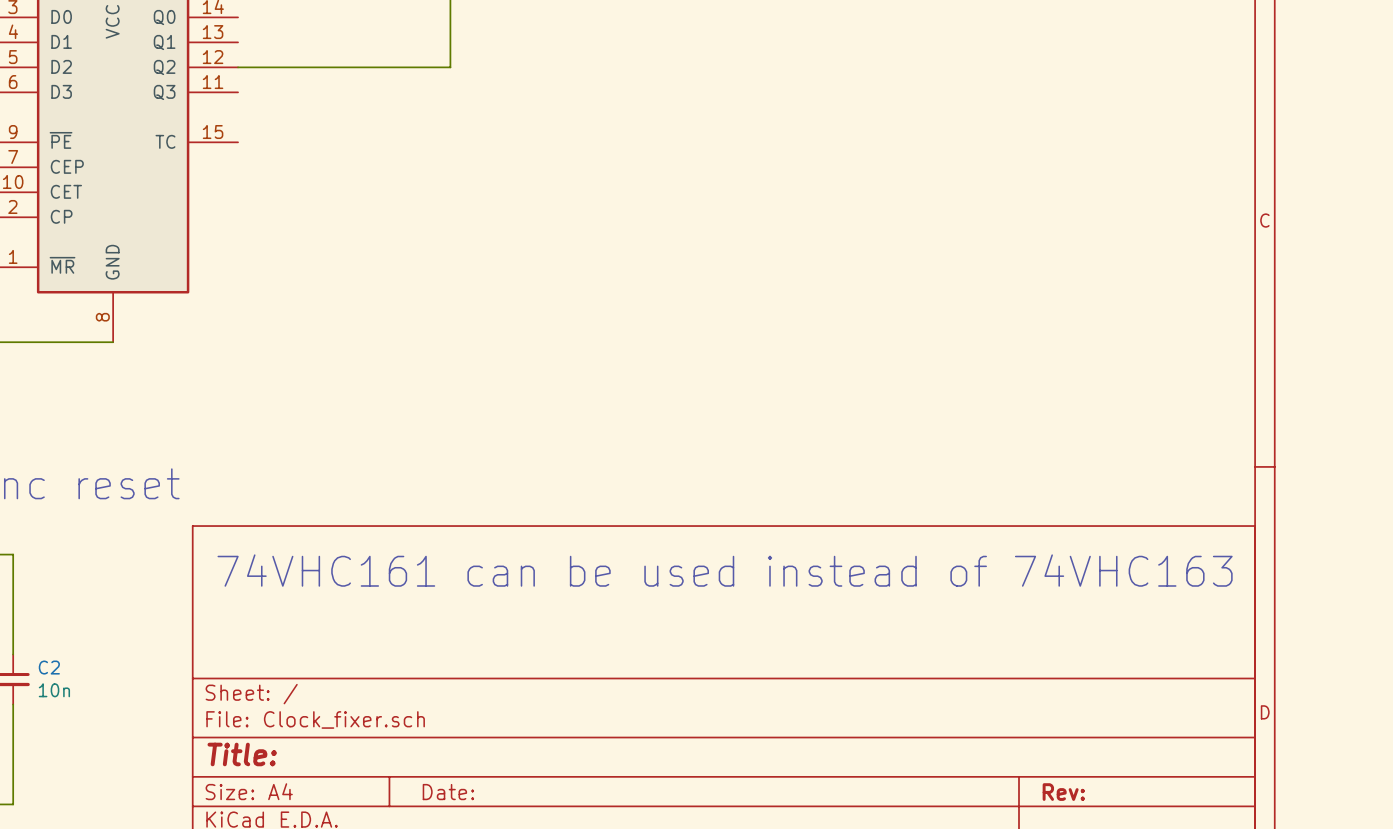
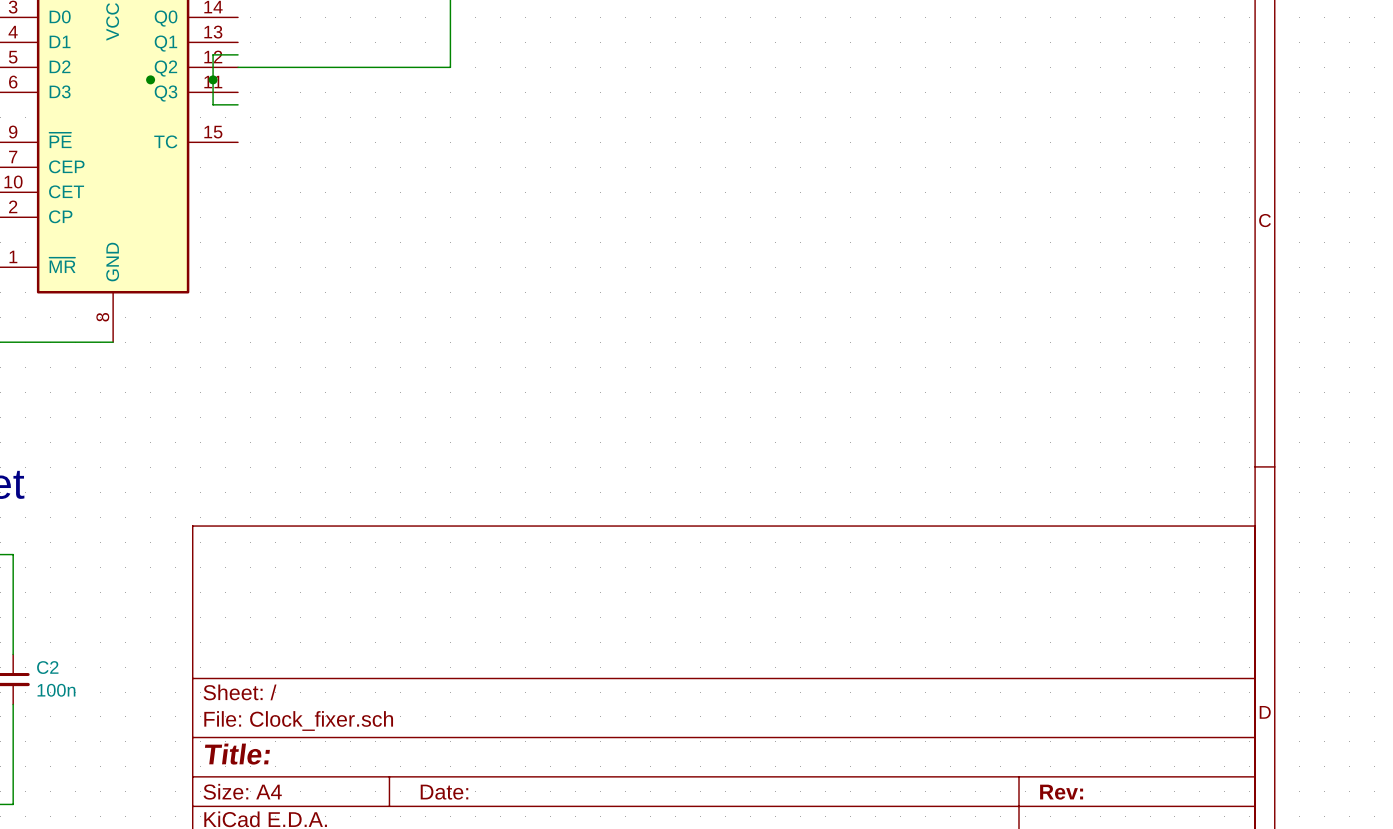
wire: none -> (238, 54) (213, 54) (213, 104) (238, 104)
junction: none -> (150, 79)
junction: none -> (213, 79)
text: 74VHC161 can be used instead of 74VHC163 (725, 570) -> none
C2 value: 10n (54, 690) -> 100n (56, 690)

